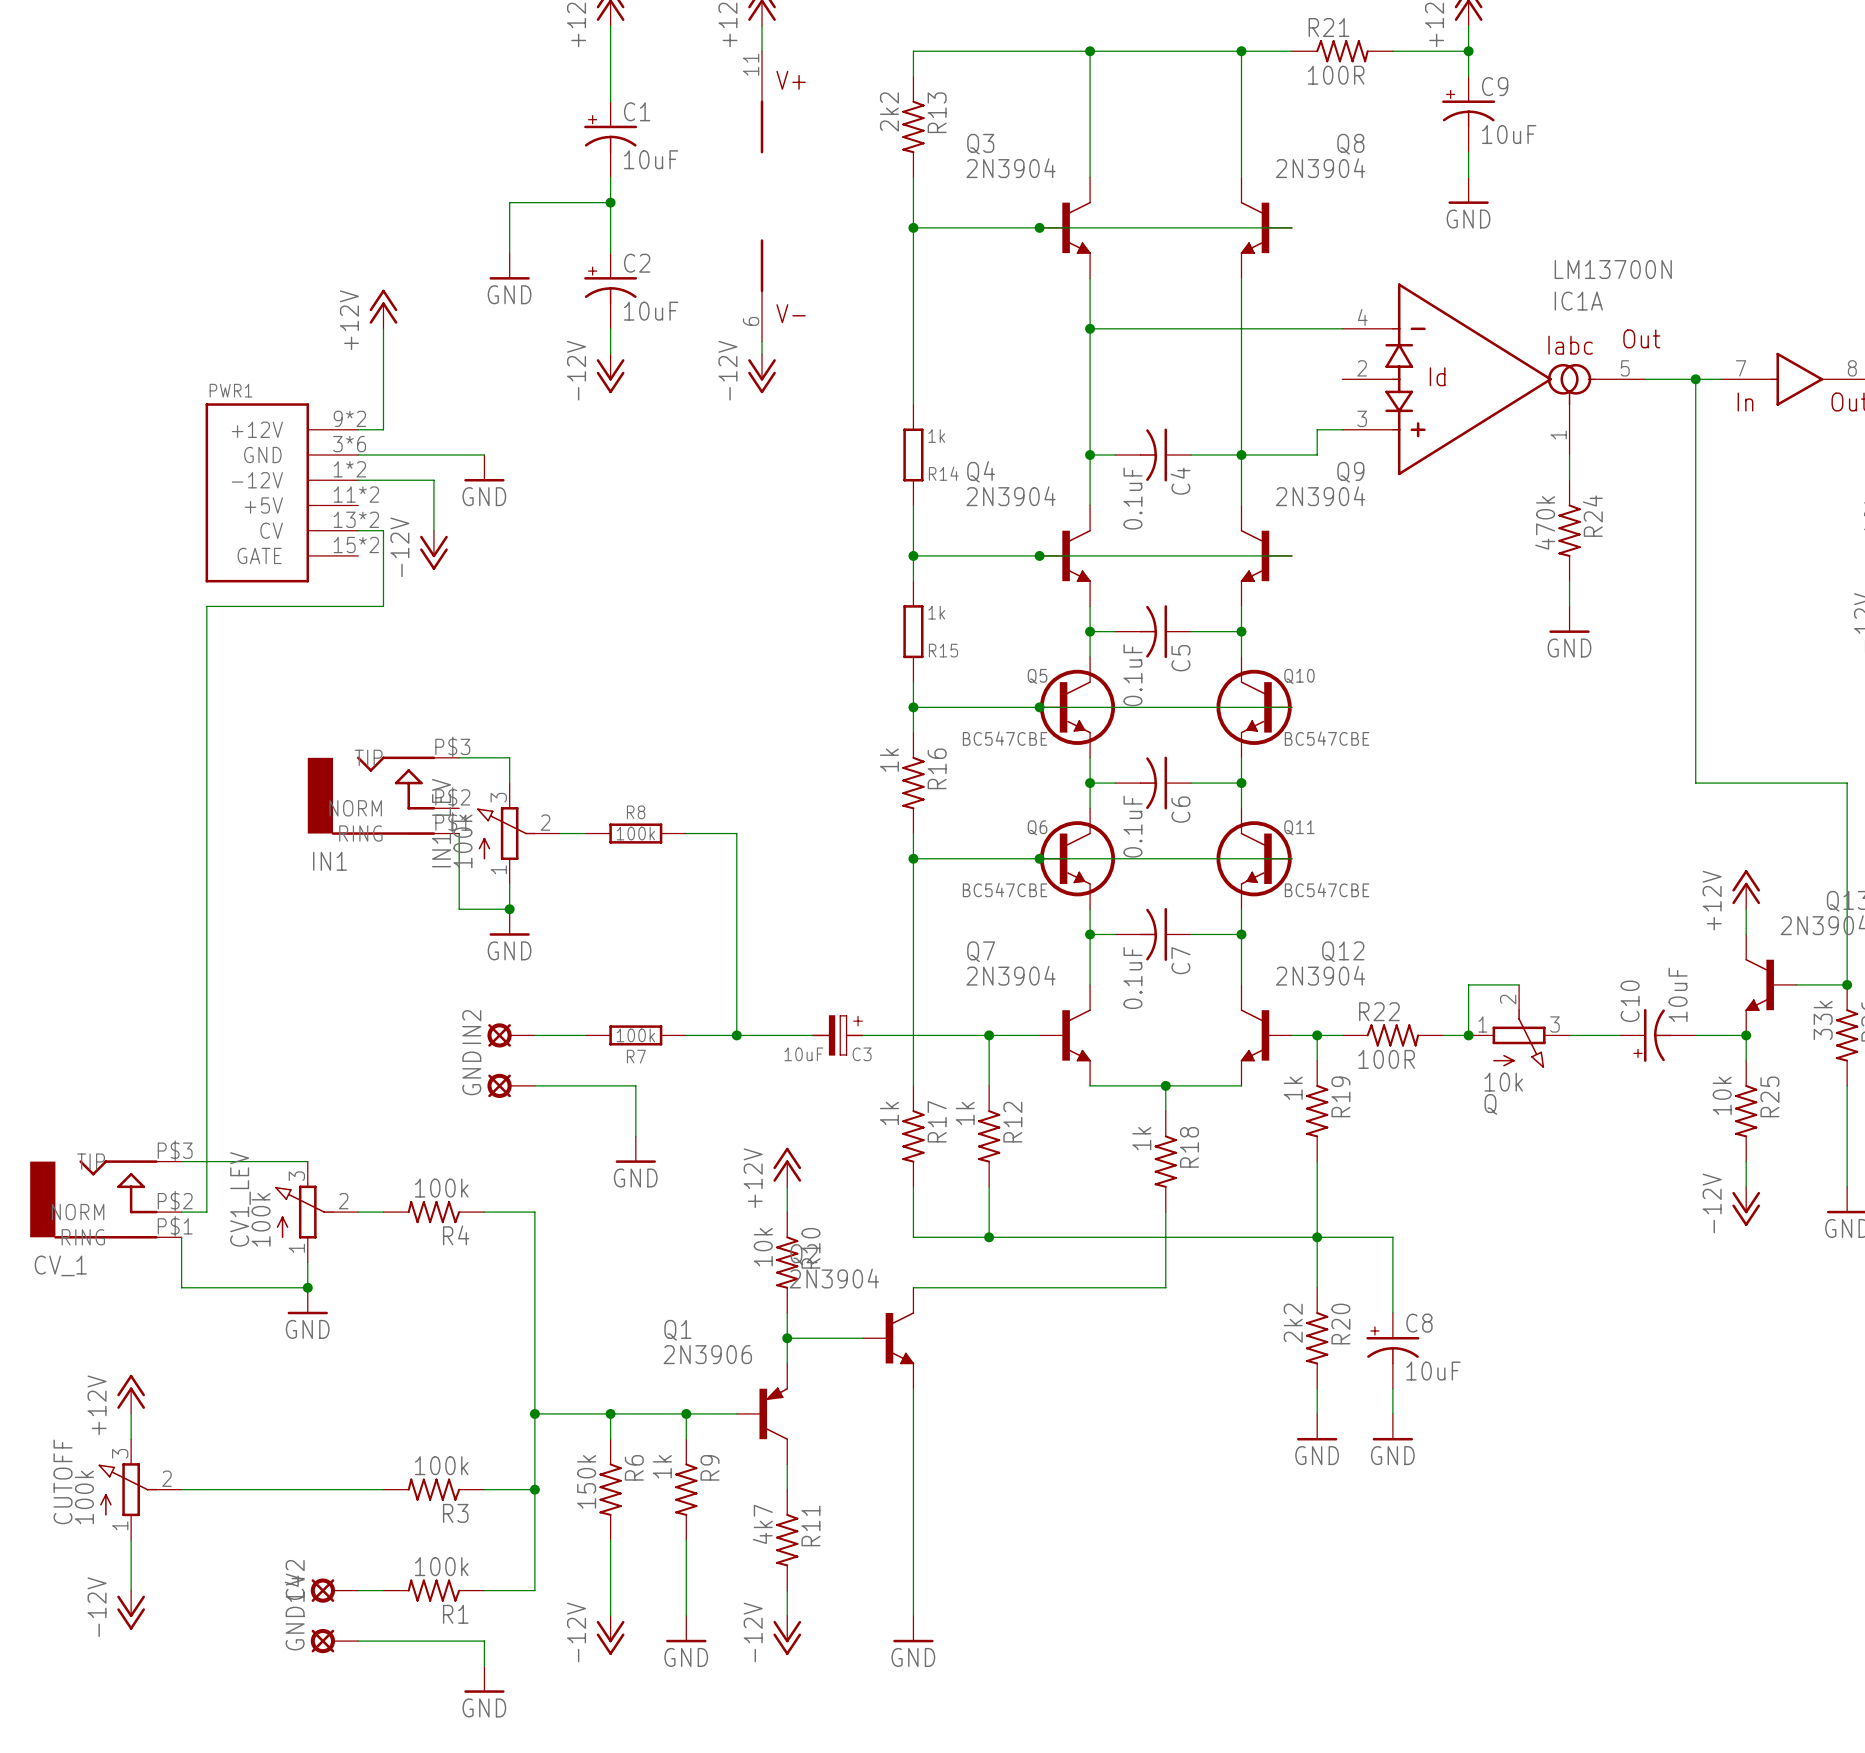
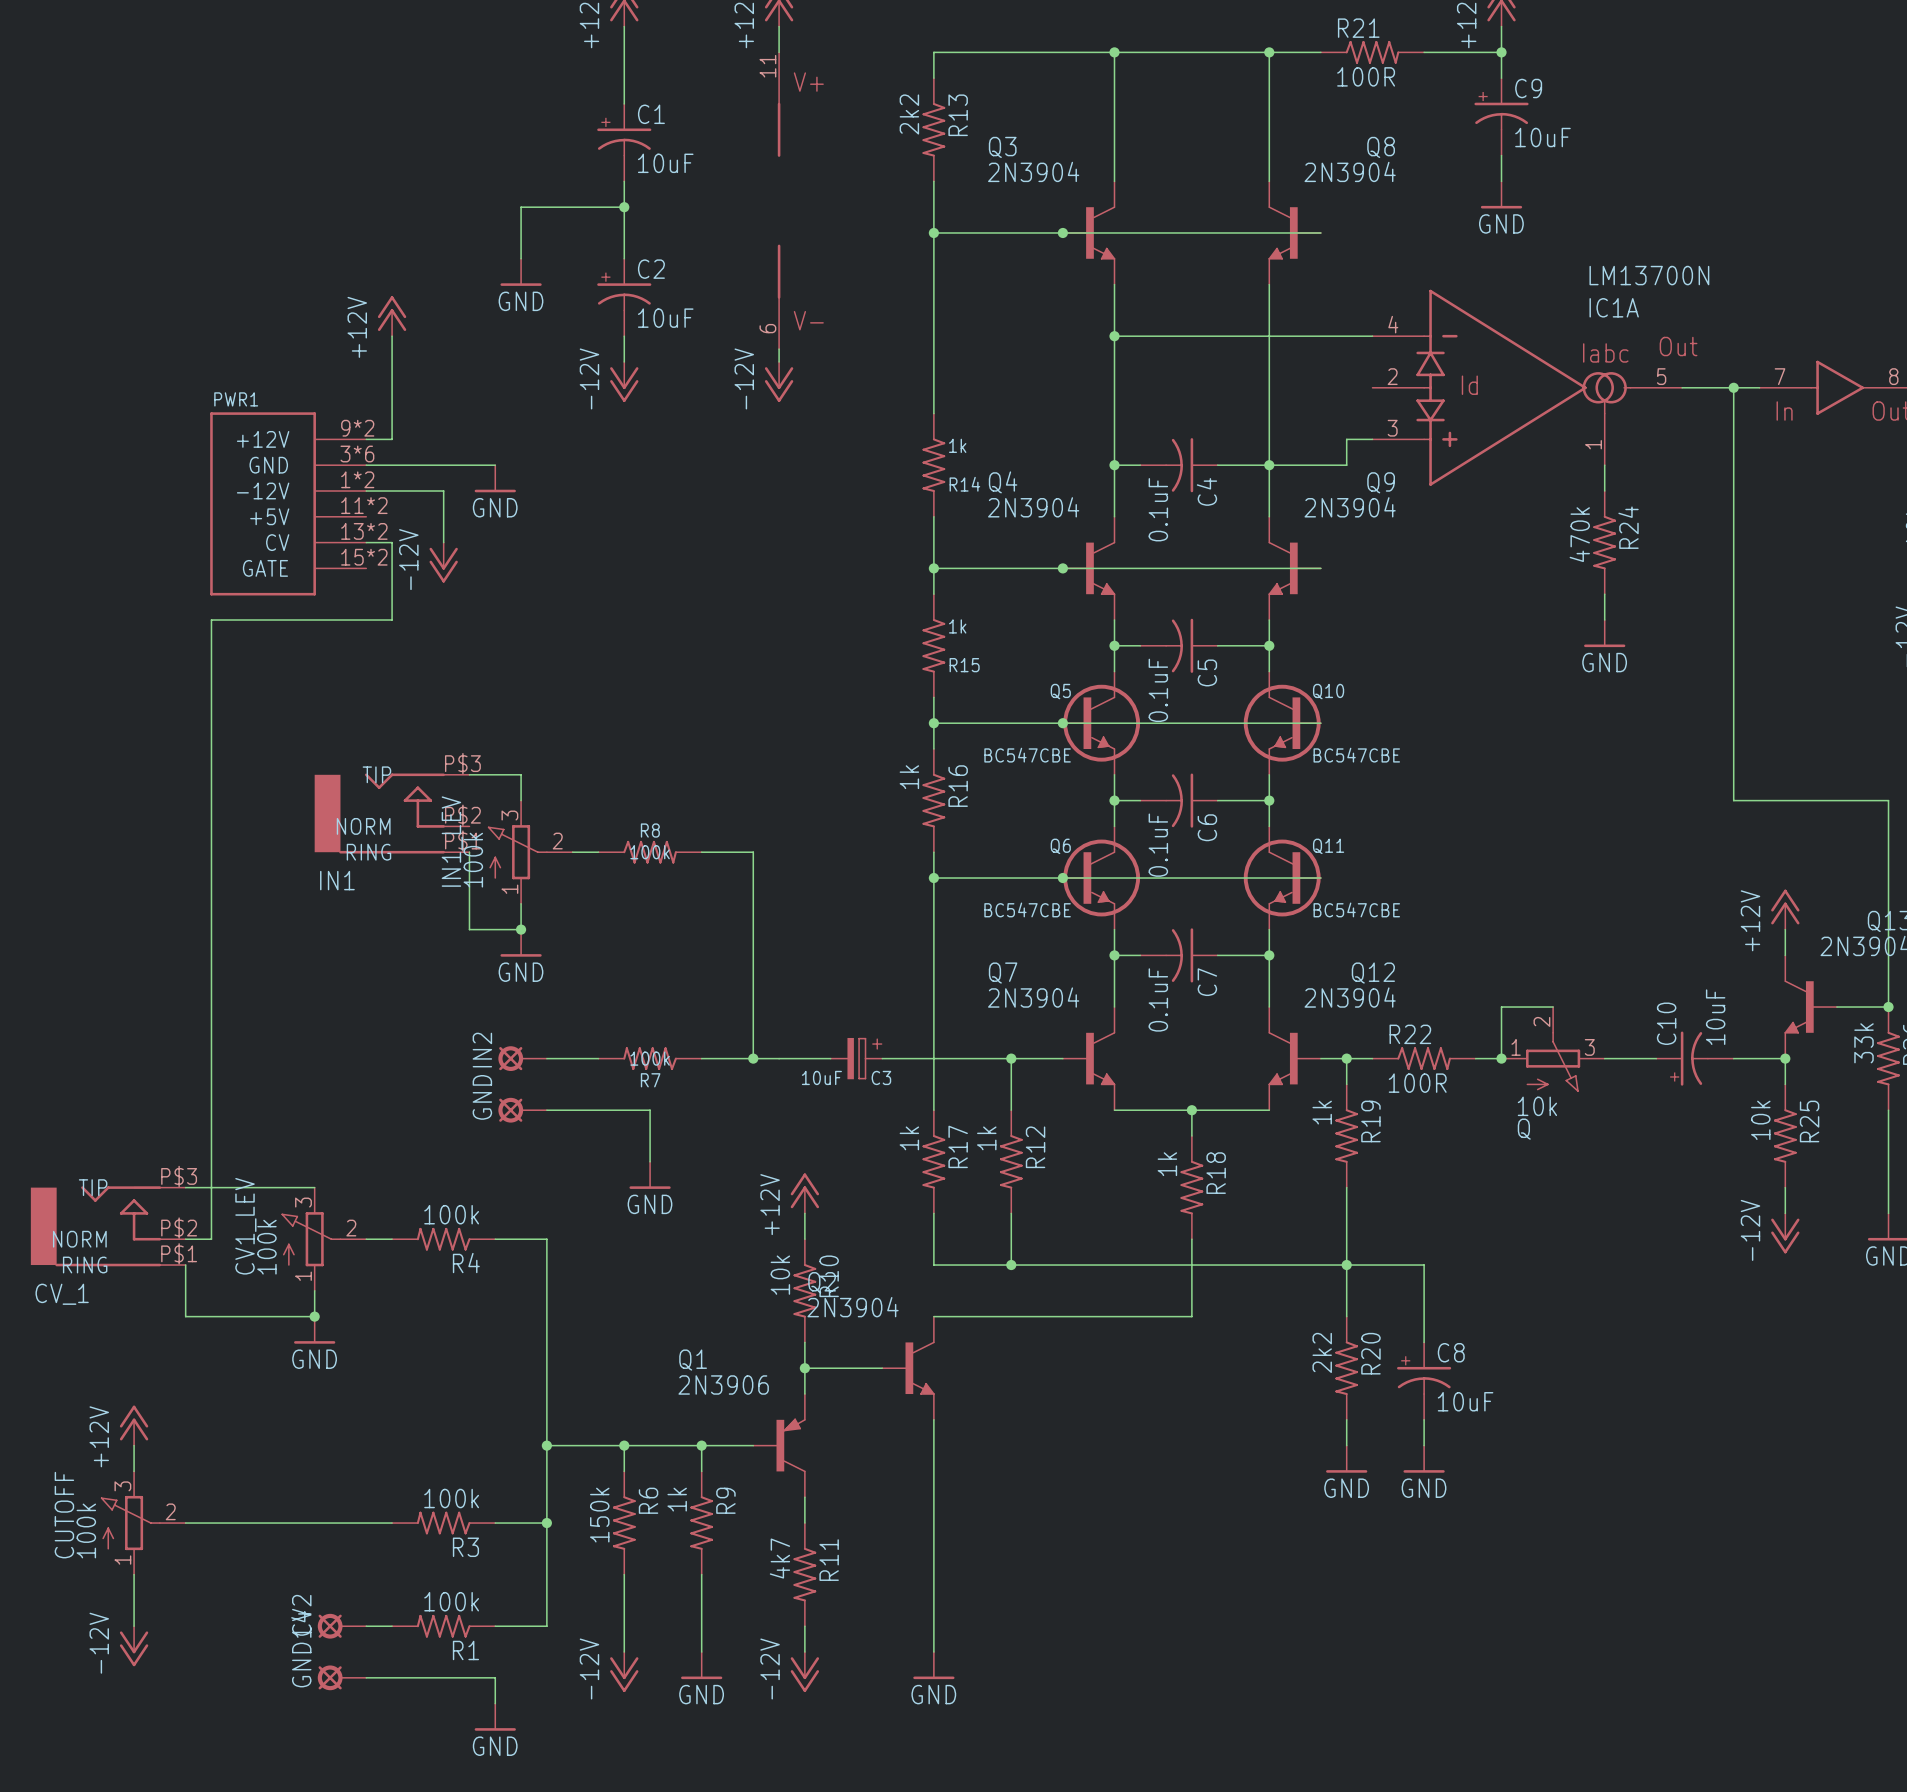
R14 symbol: [903, 404, 924, 506] -> [922, 413, 946, 517]
R15 symbol: [903, 581, 924, 683] -> [922, 594, 946, 698]
R8 symbol: [585, 823, 687, 844] -> [598, 840, 702, 864]
R7 symbol: [585, 1025, 687, 1046] -> [598, 1047, 702, 1070]

